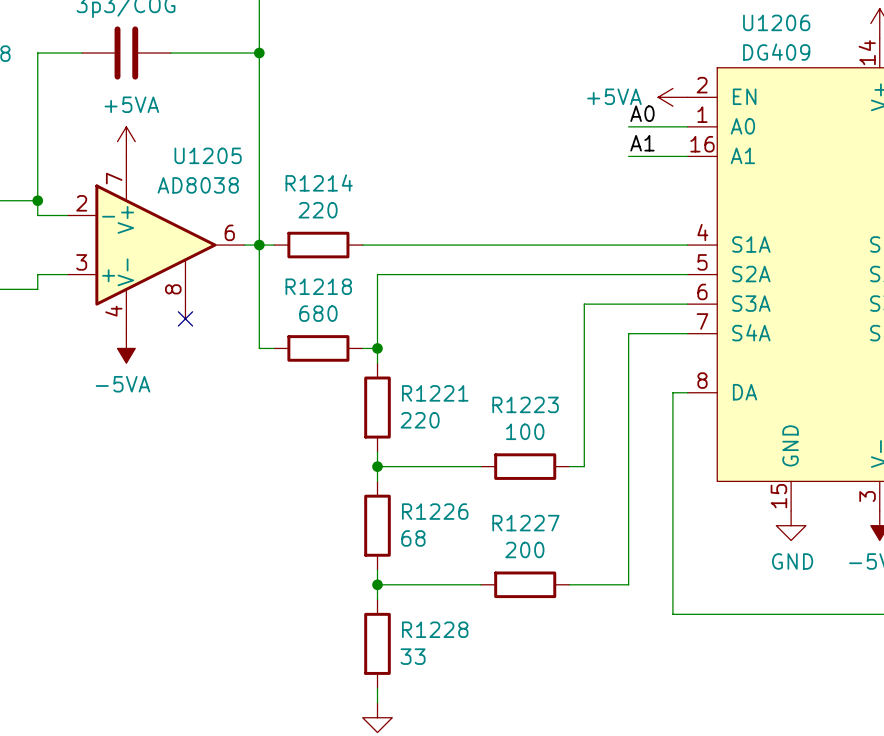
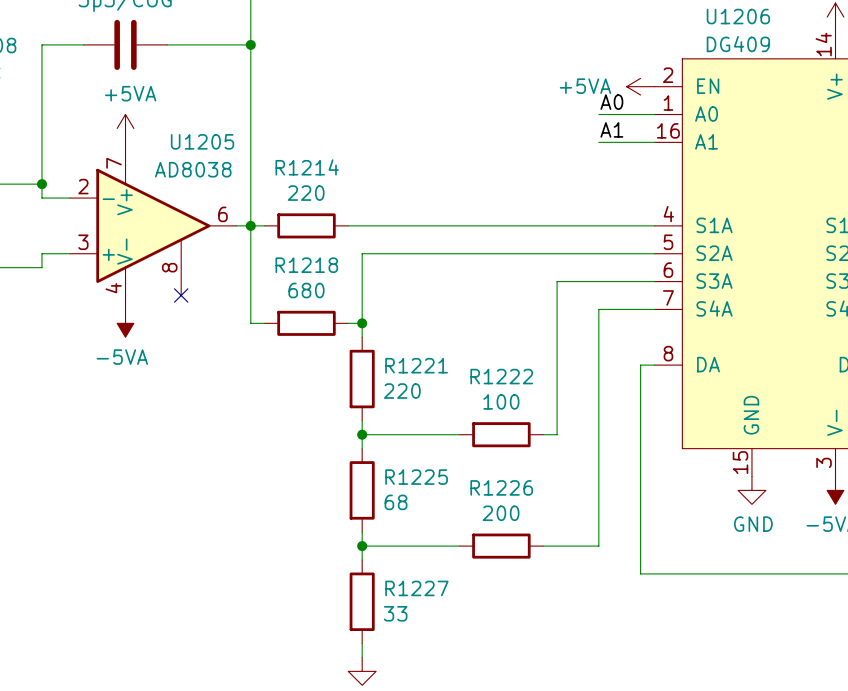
R1223 name: R1223 (525, 404) -> R1222 (501, 376)
R1226 name: R1226 (435, 511) -> R1225 (416, 477)
R1227 name: R1227 (525, 523) -> R1226 (501, 487)
R1228 name: R1228 (435, 629) -> R1227 (416, 588)

